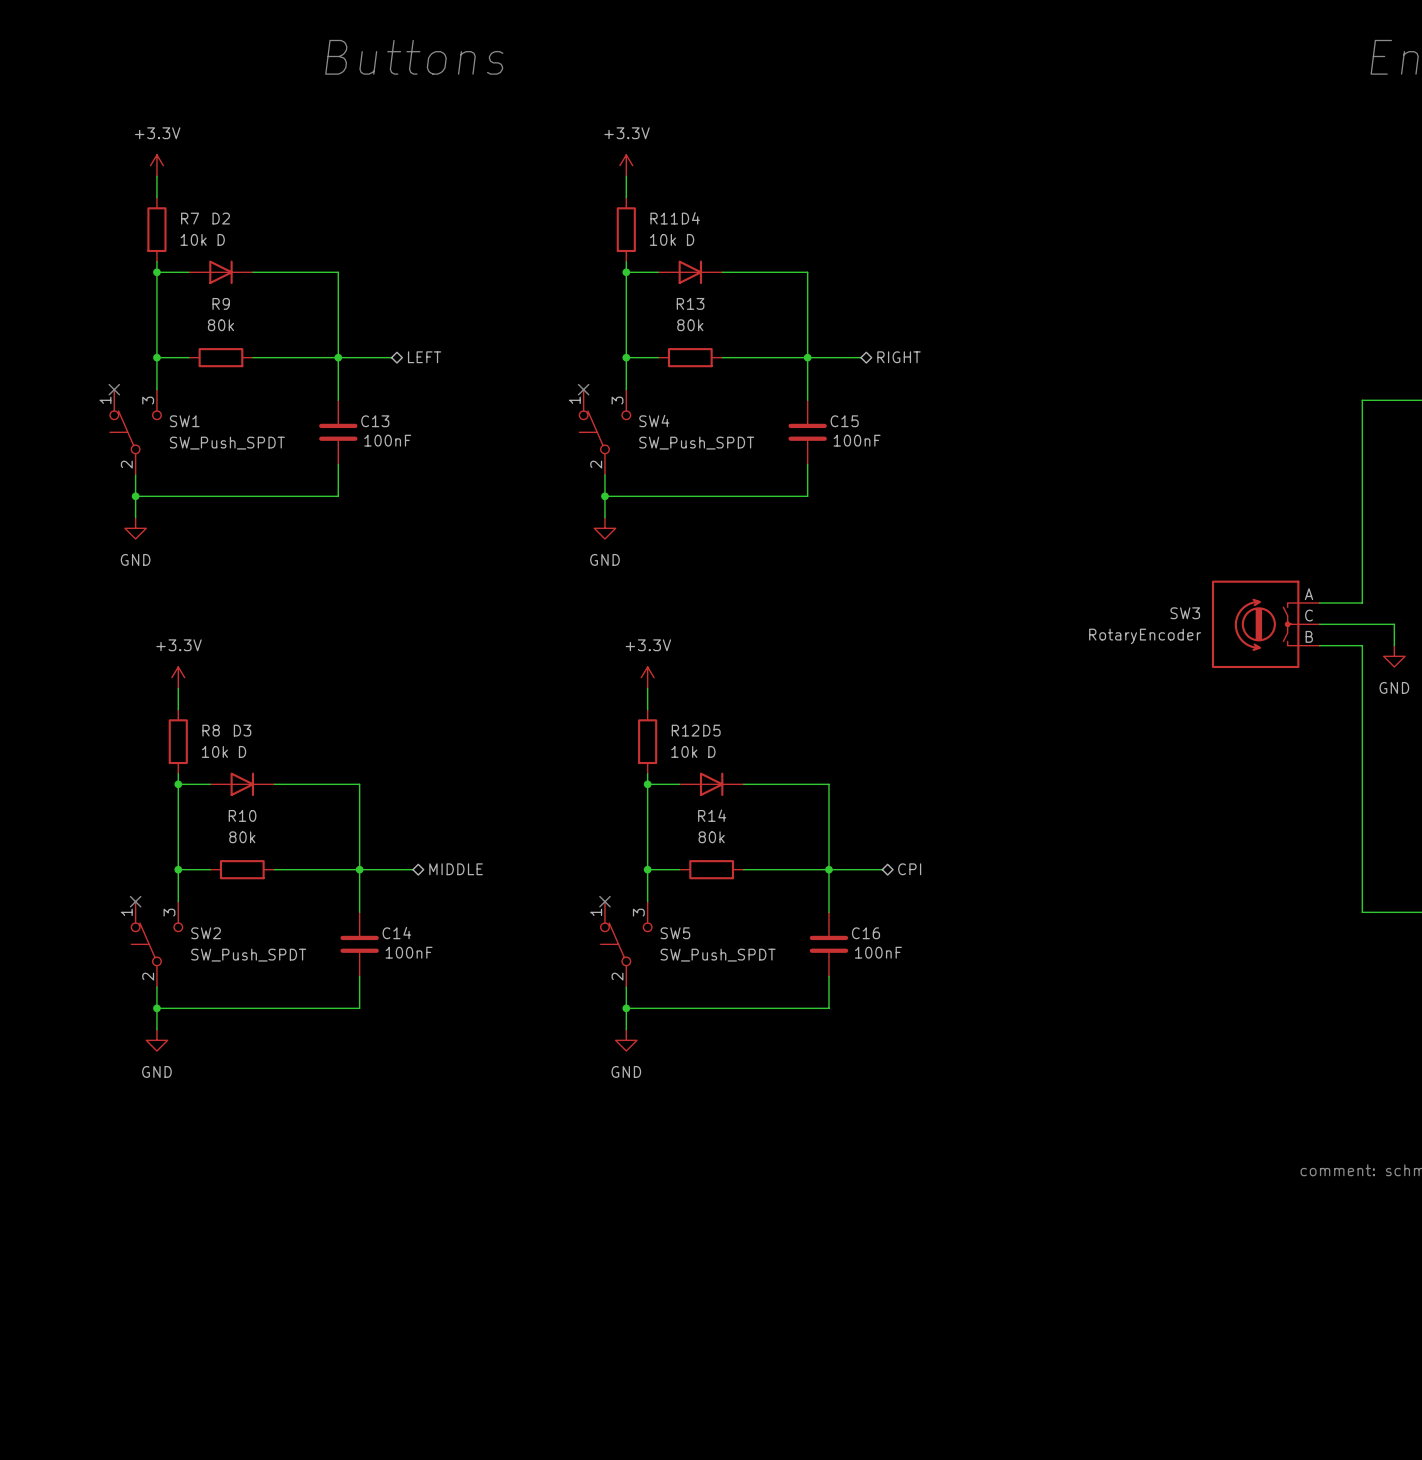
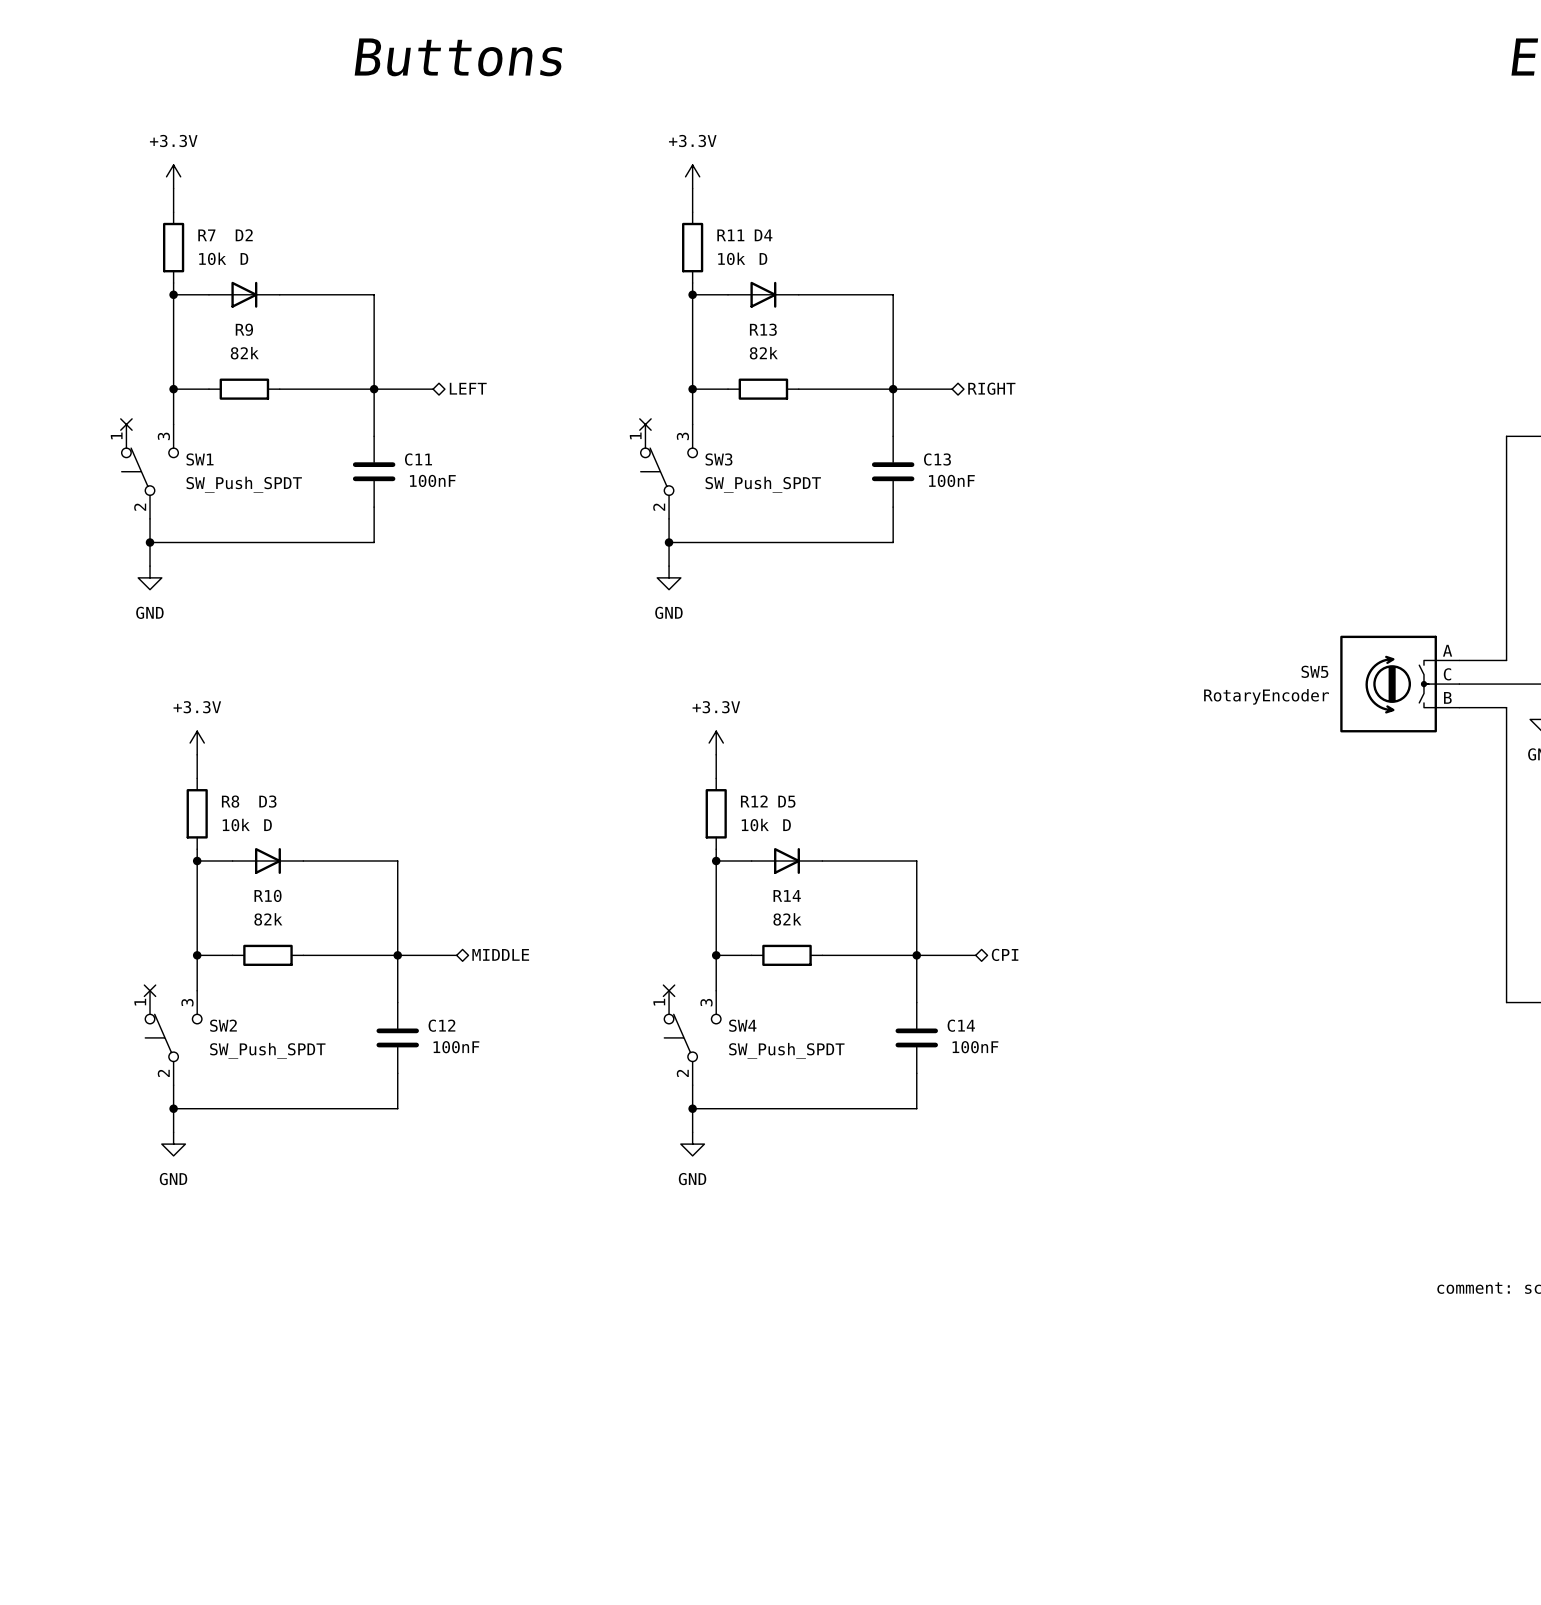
R9 value: 80k (220, 325) -> 82k (244, 353)
R13 value: 80k (690, 325) -> 82k (763, 353)
C13 name: C13 (375, 421) -> C11 (418, 459)
SW4 name: SW4 (654, 421) -> SW3 (718, 459)
C15 name: C15 (844, 421) -> C13 (937, 459)
SW3 name: SW3 (1185, 613) -> SW5 (1314, 671)
R10 value: 80k (242, 837) -> 82k (268, 919)
R14 value: 80k (711, 837) -> 82k (787, 919)
C14 name: C14 (396, 933) -> C12 (441, 1025)
SW5 name: SW5 (675, 933) -> SW4 (742, 1025)
C16 name: C16 (865, 933) -> C14 (961, 1025)

